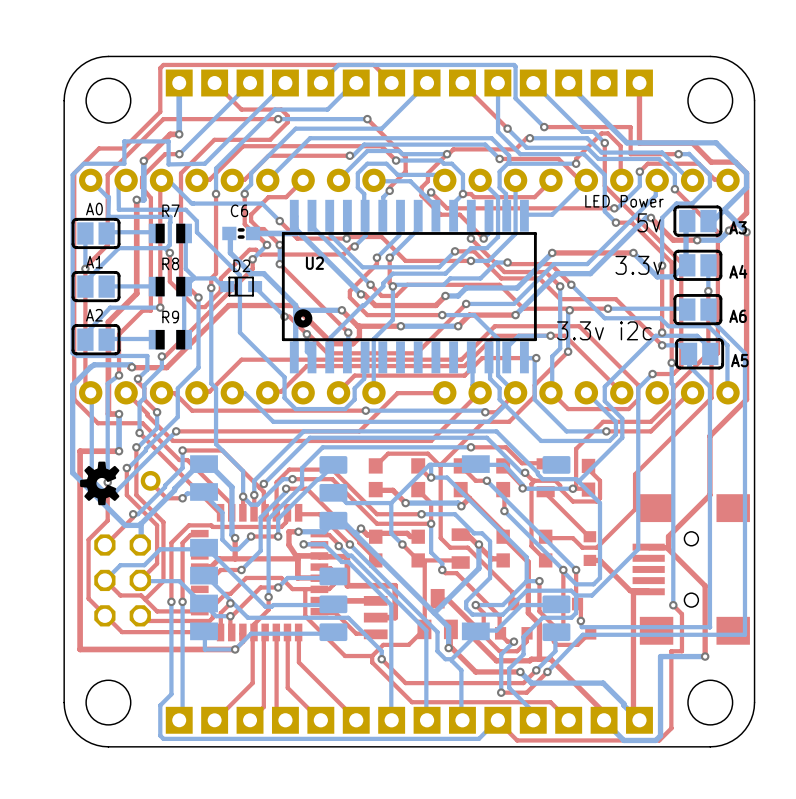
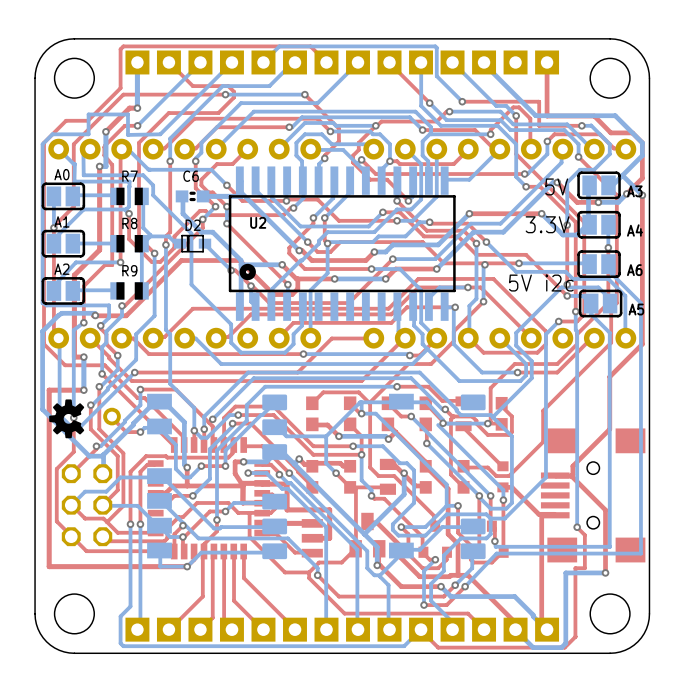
text: LED Power (624, 201) -> none
text: 5v (649, 222) -> 5V (556, 186)
text: 3.3v (638, 265) -> 3.3V (547, 224)
text: 3.3v i2c (604, 330) -> none
text: none -> 5V i2c (541, 283)
bottom track: none -> (438, 425) (503, 490) (503, 500)
top track: none -> (503, 500) (503, 552) (502, 552)
via: none -> (503, 500)

